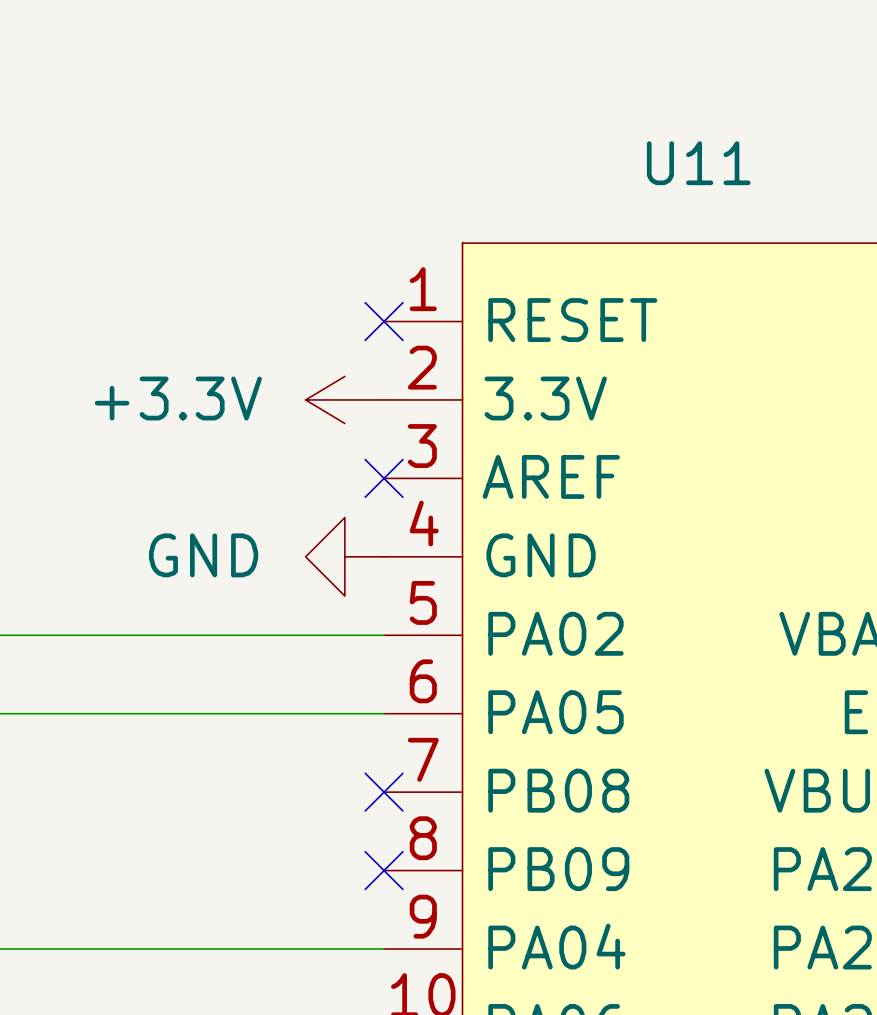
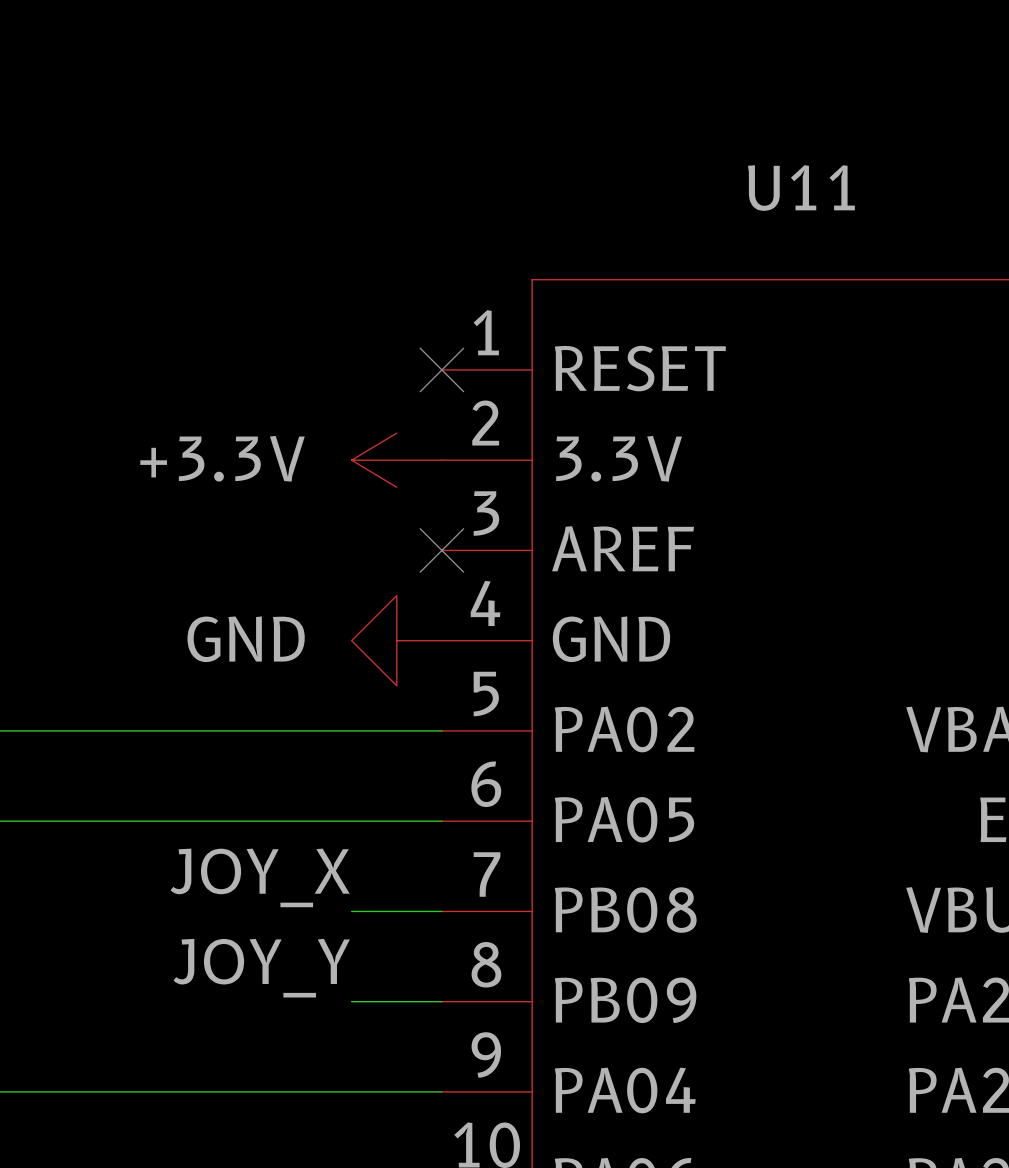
label: none -> JOY_X (260, 877)
wire: none -> (351, 911) (441, 911)
no-connect mark: (384, 792) -> none
label: none -> JOY_Y (261, 968)
wire: none -> (351, 1001) (441, 1001)
no-connect mark: (384, 870) -> none

